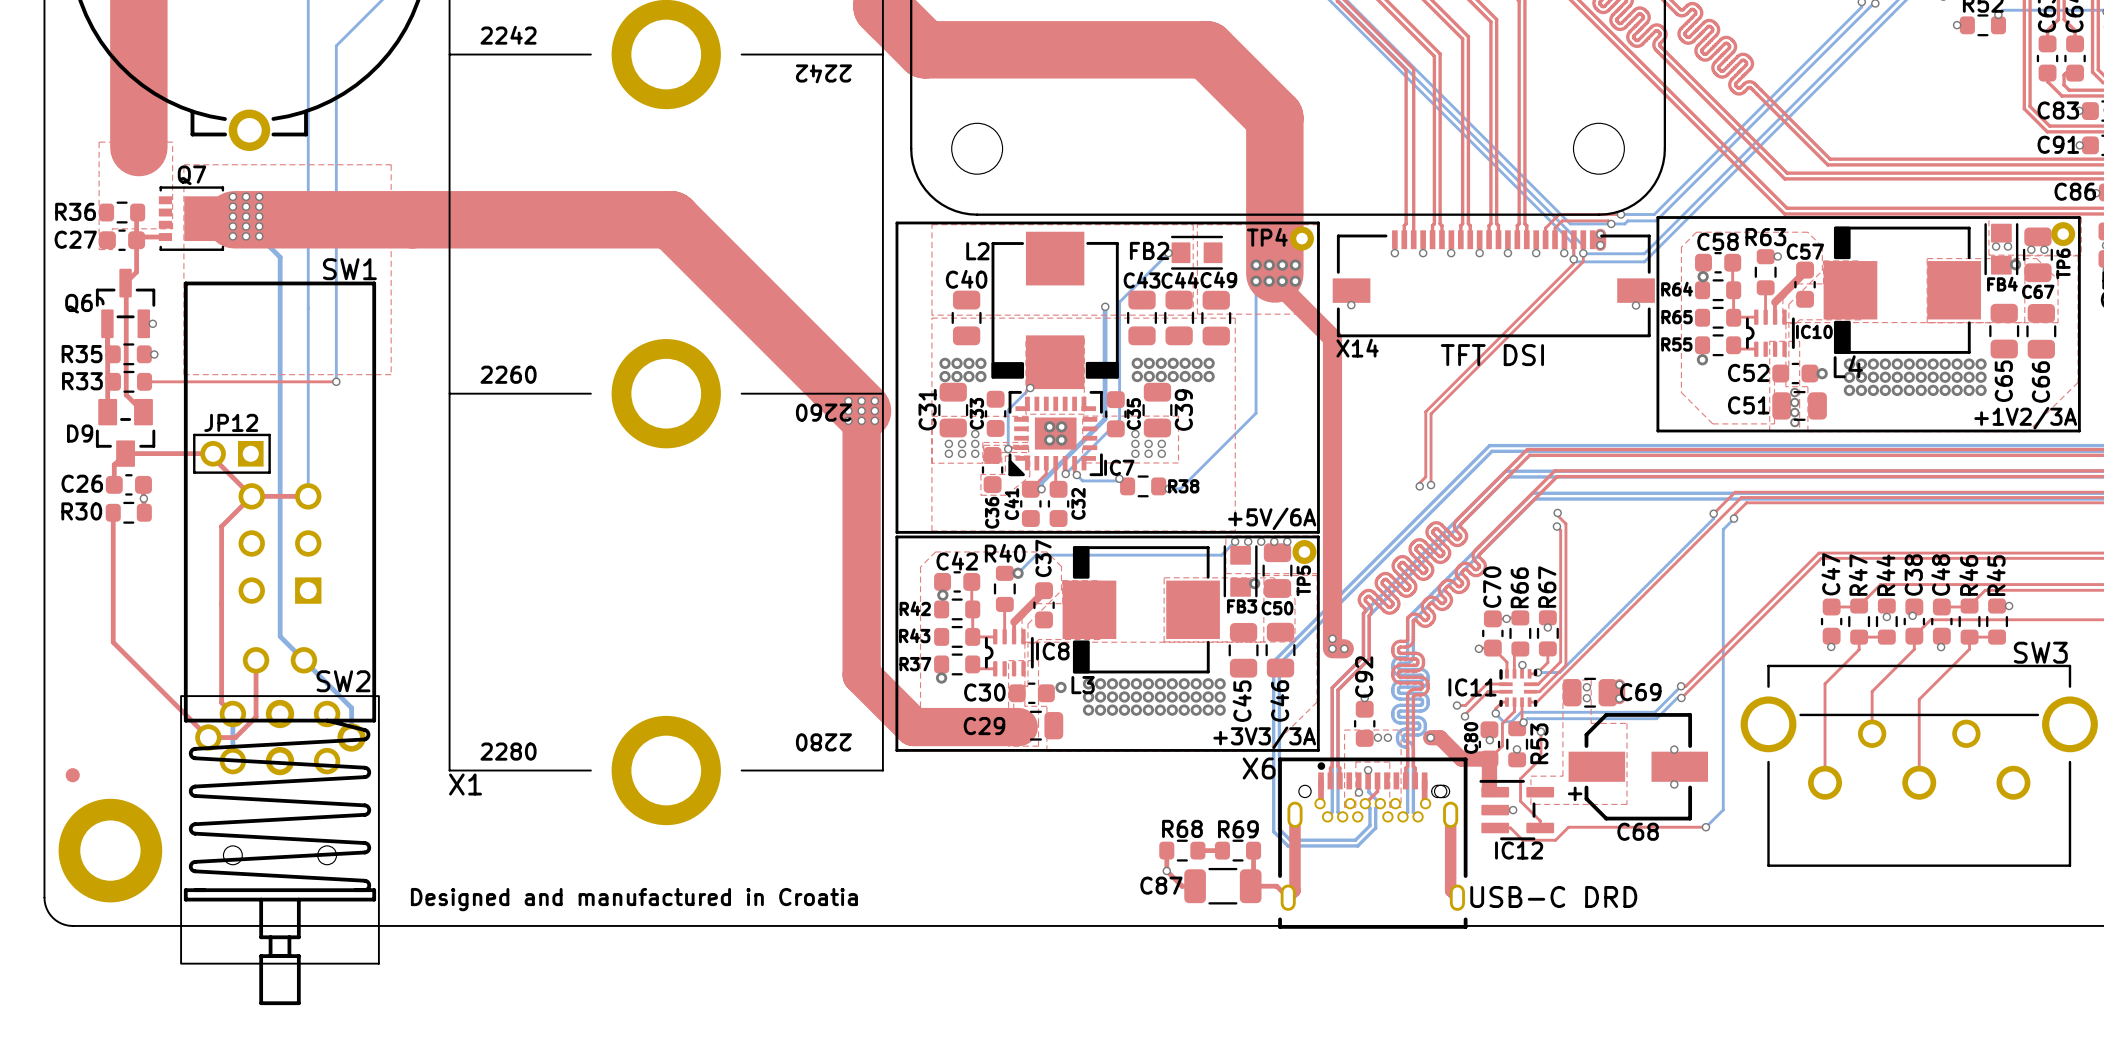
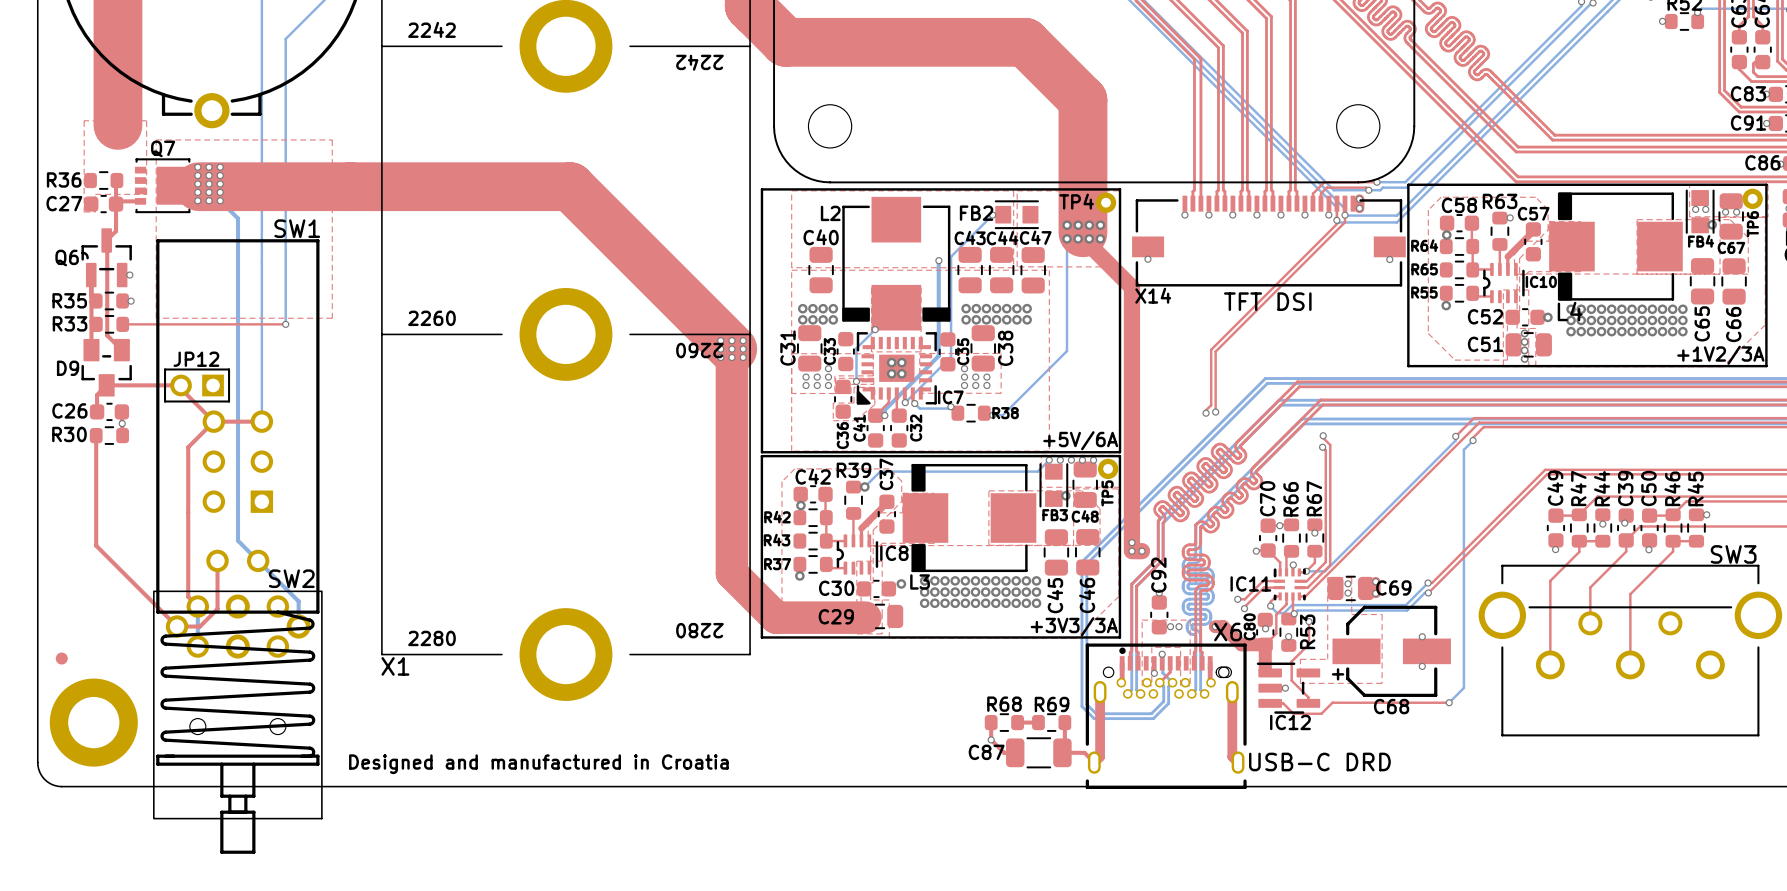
C49 name: C49 (1218, 279) -> C47 (1035, 237)
C39 name: C39 (1183, 410) -> C38 (1005, 348)
R40 name: R40 (1005, 553) -> R39 (853, 470)
C47 name: C47 (1830, 574) -> C49 (1555, 488)
C38 name: C38 (1913, 575) -> C39 (1625, 488)
C48 name: C48 (1940, 575) -> C50 (1648, 488)
C50 name: C50 (1277, 608) -> C48 (1085, 516)
X6 name position: X6 (1259, 768) -> X6 (1228, 632)

